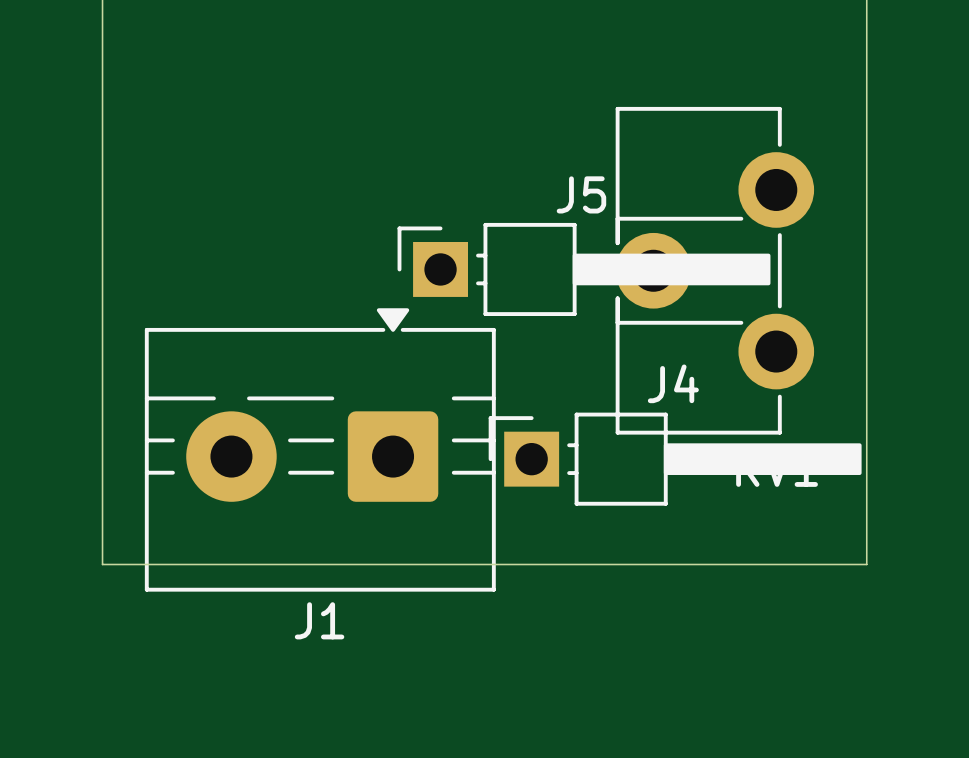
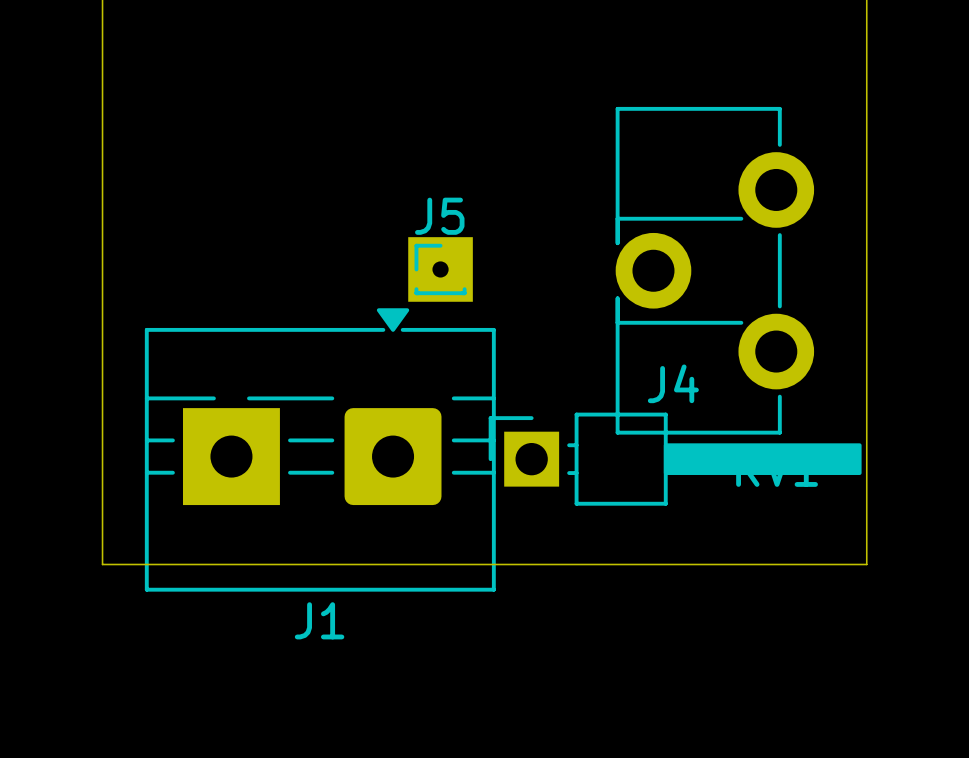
J5 footprint: [397, 222, 771, 317] -> [408, 237, 473, 302]
J1 footprint: [144, 308, 496, 592] -> [144, 308, 496, 592]

